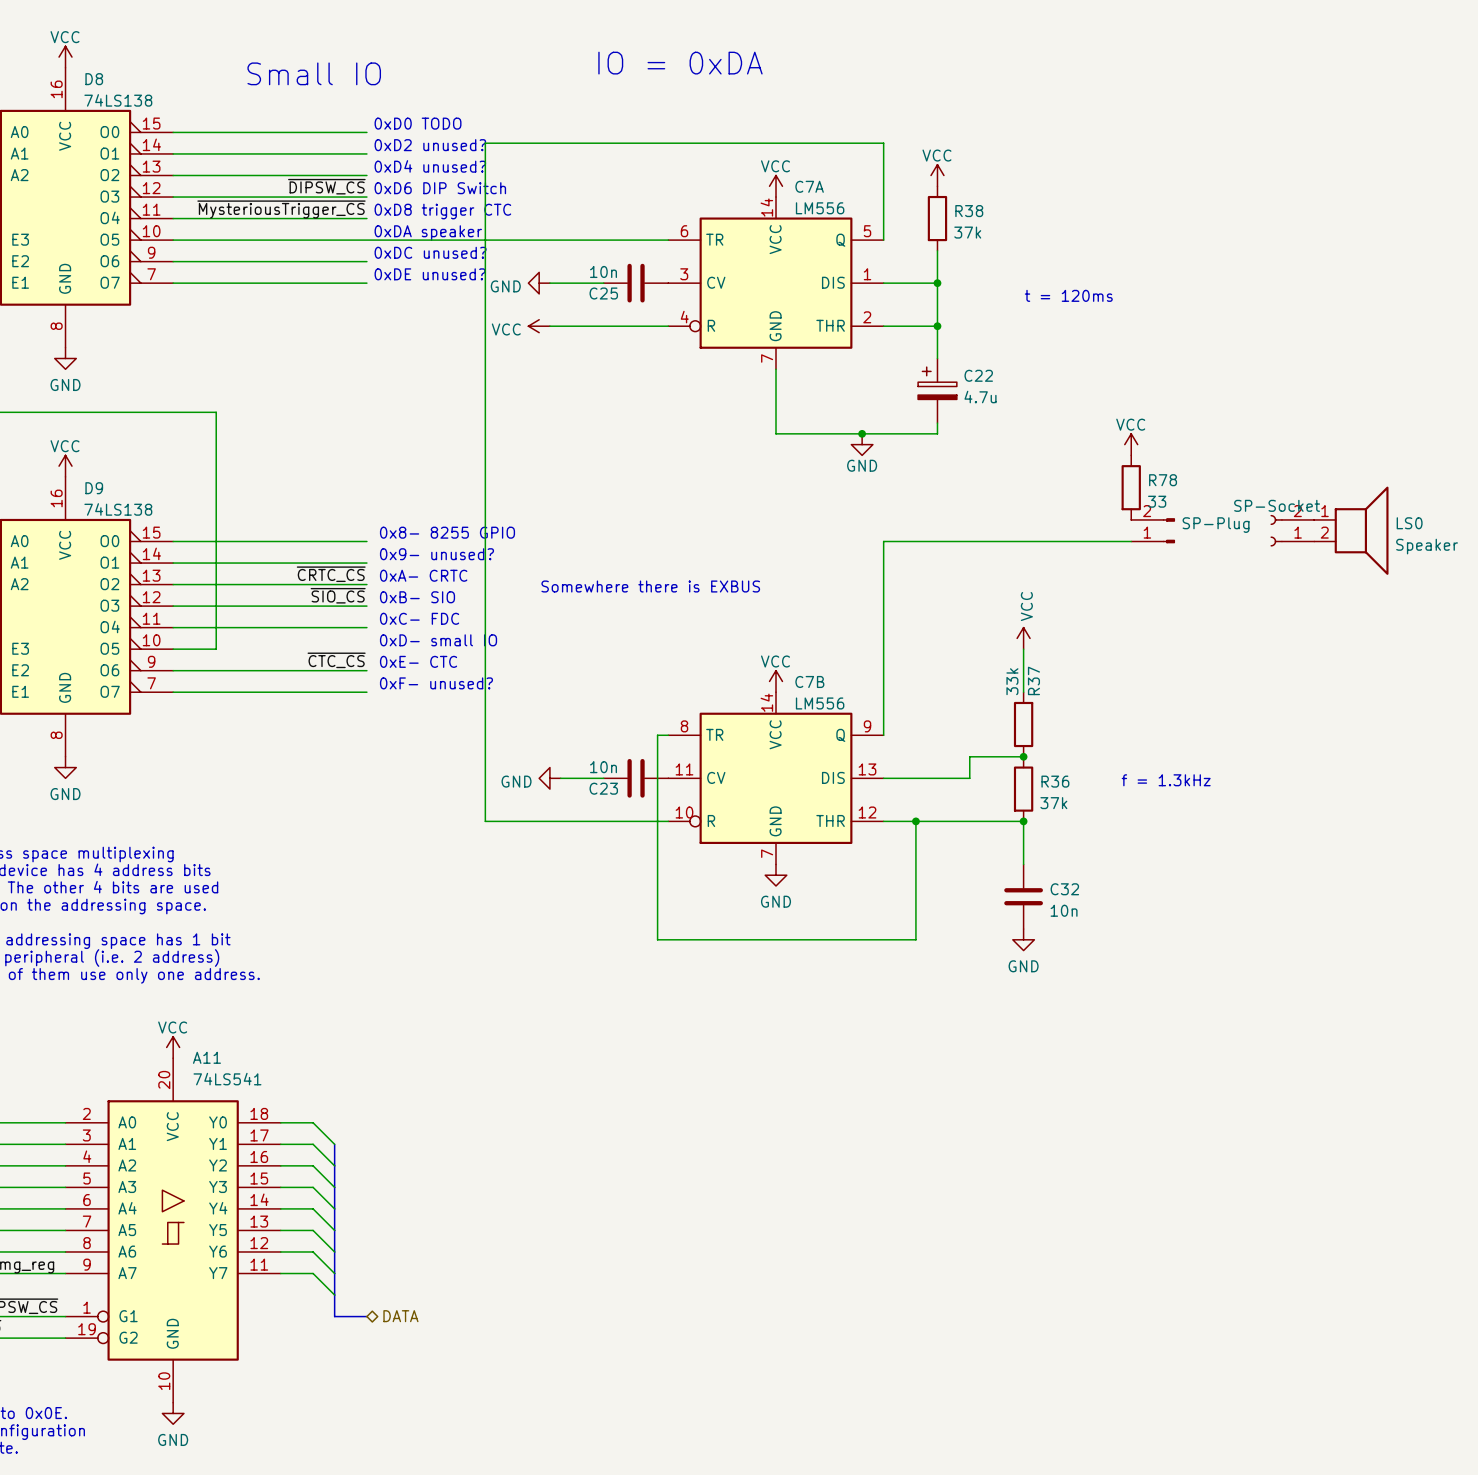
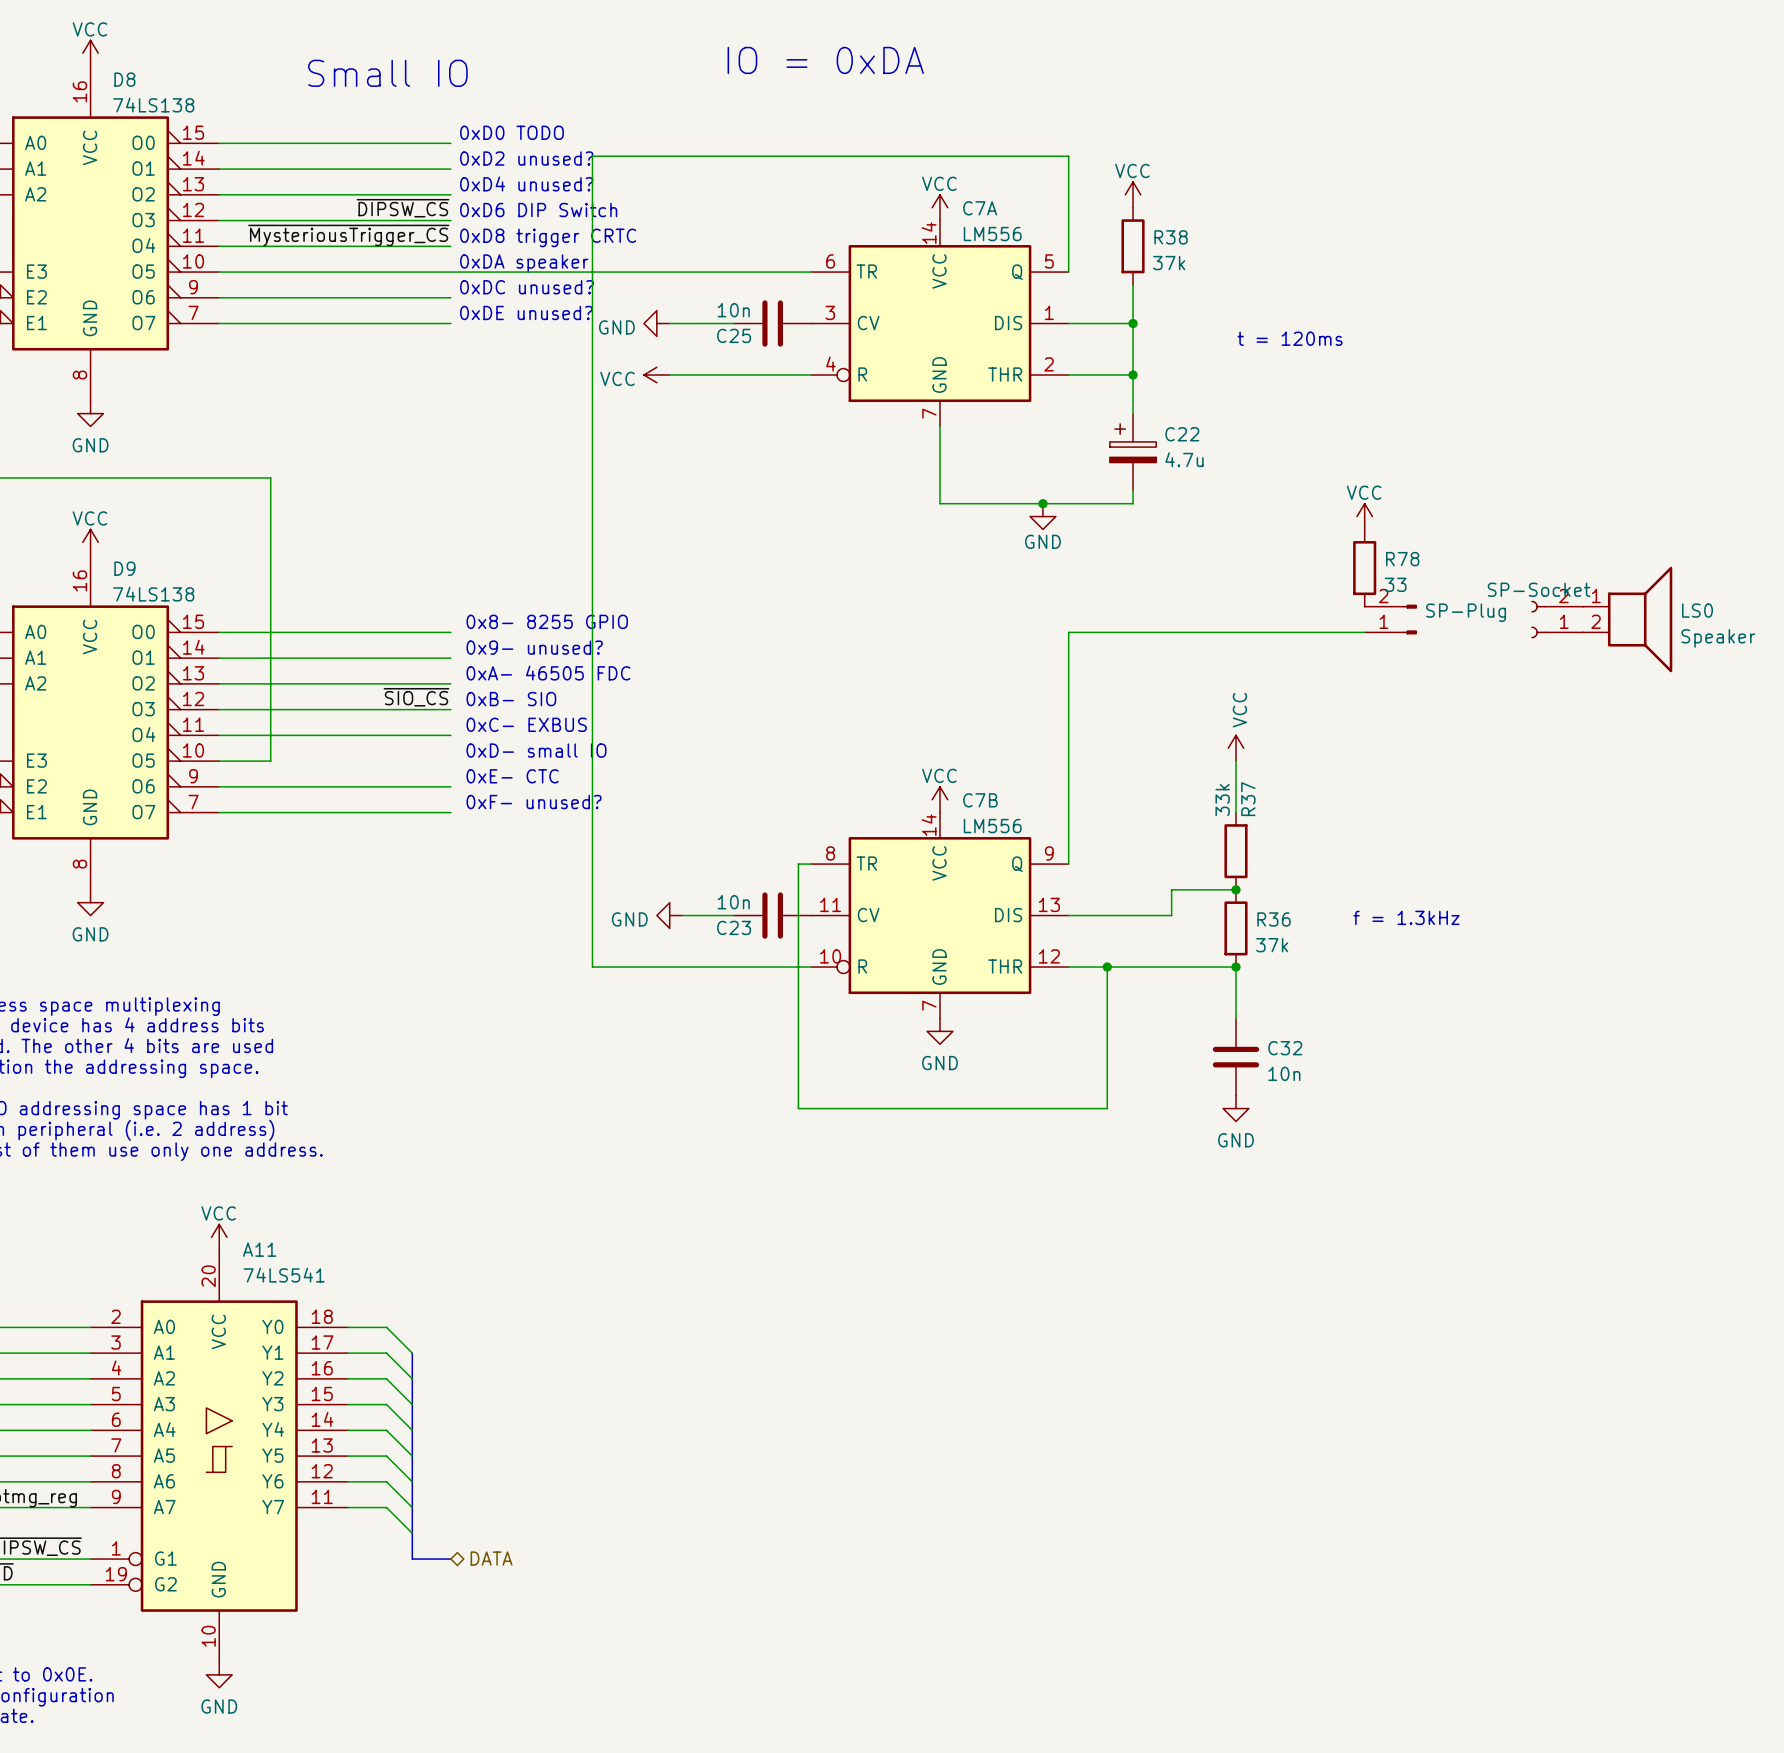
text: 0xD8 trigger CTC (442, 211) -> 0xD8 trigger CRTC (548, 237)
label: ~{CRTC_CS} (331, 574) -> none
text: 0xA- CRTC (423, 575) -> 0xA- 46505 FDC (548, 673)
text: Somewhere there is EXBUS (650, 586) -> none
text: 0xC- FDC (419, 618) -> 0xC- EXBUS (526, 724)
label: ~{CTC_CS} (336, 660) -> none

